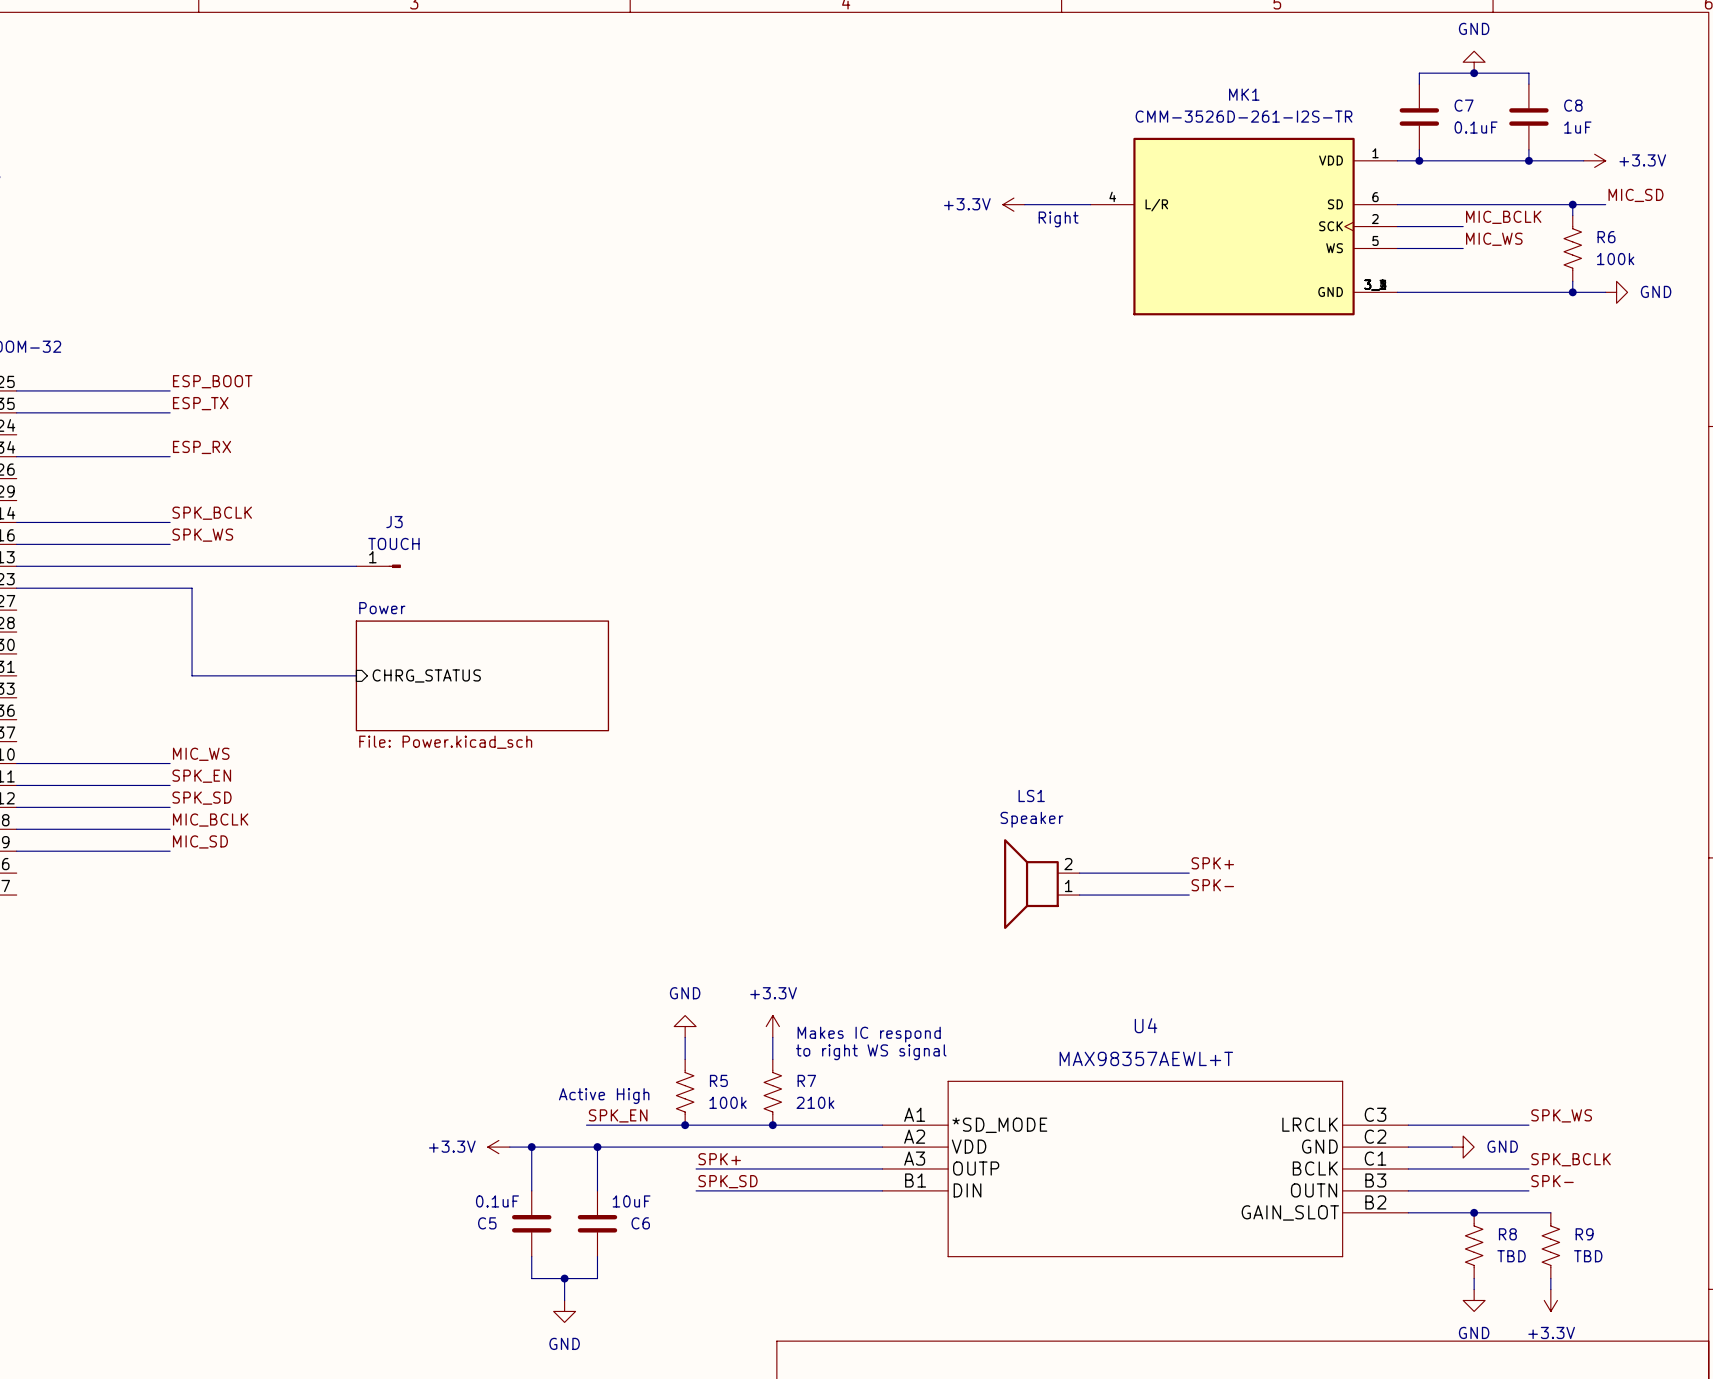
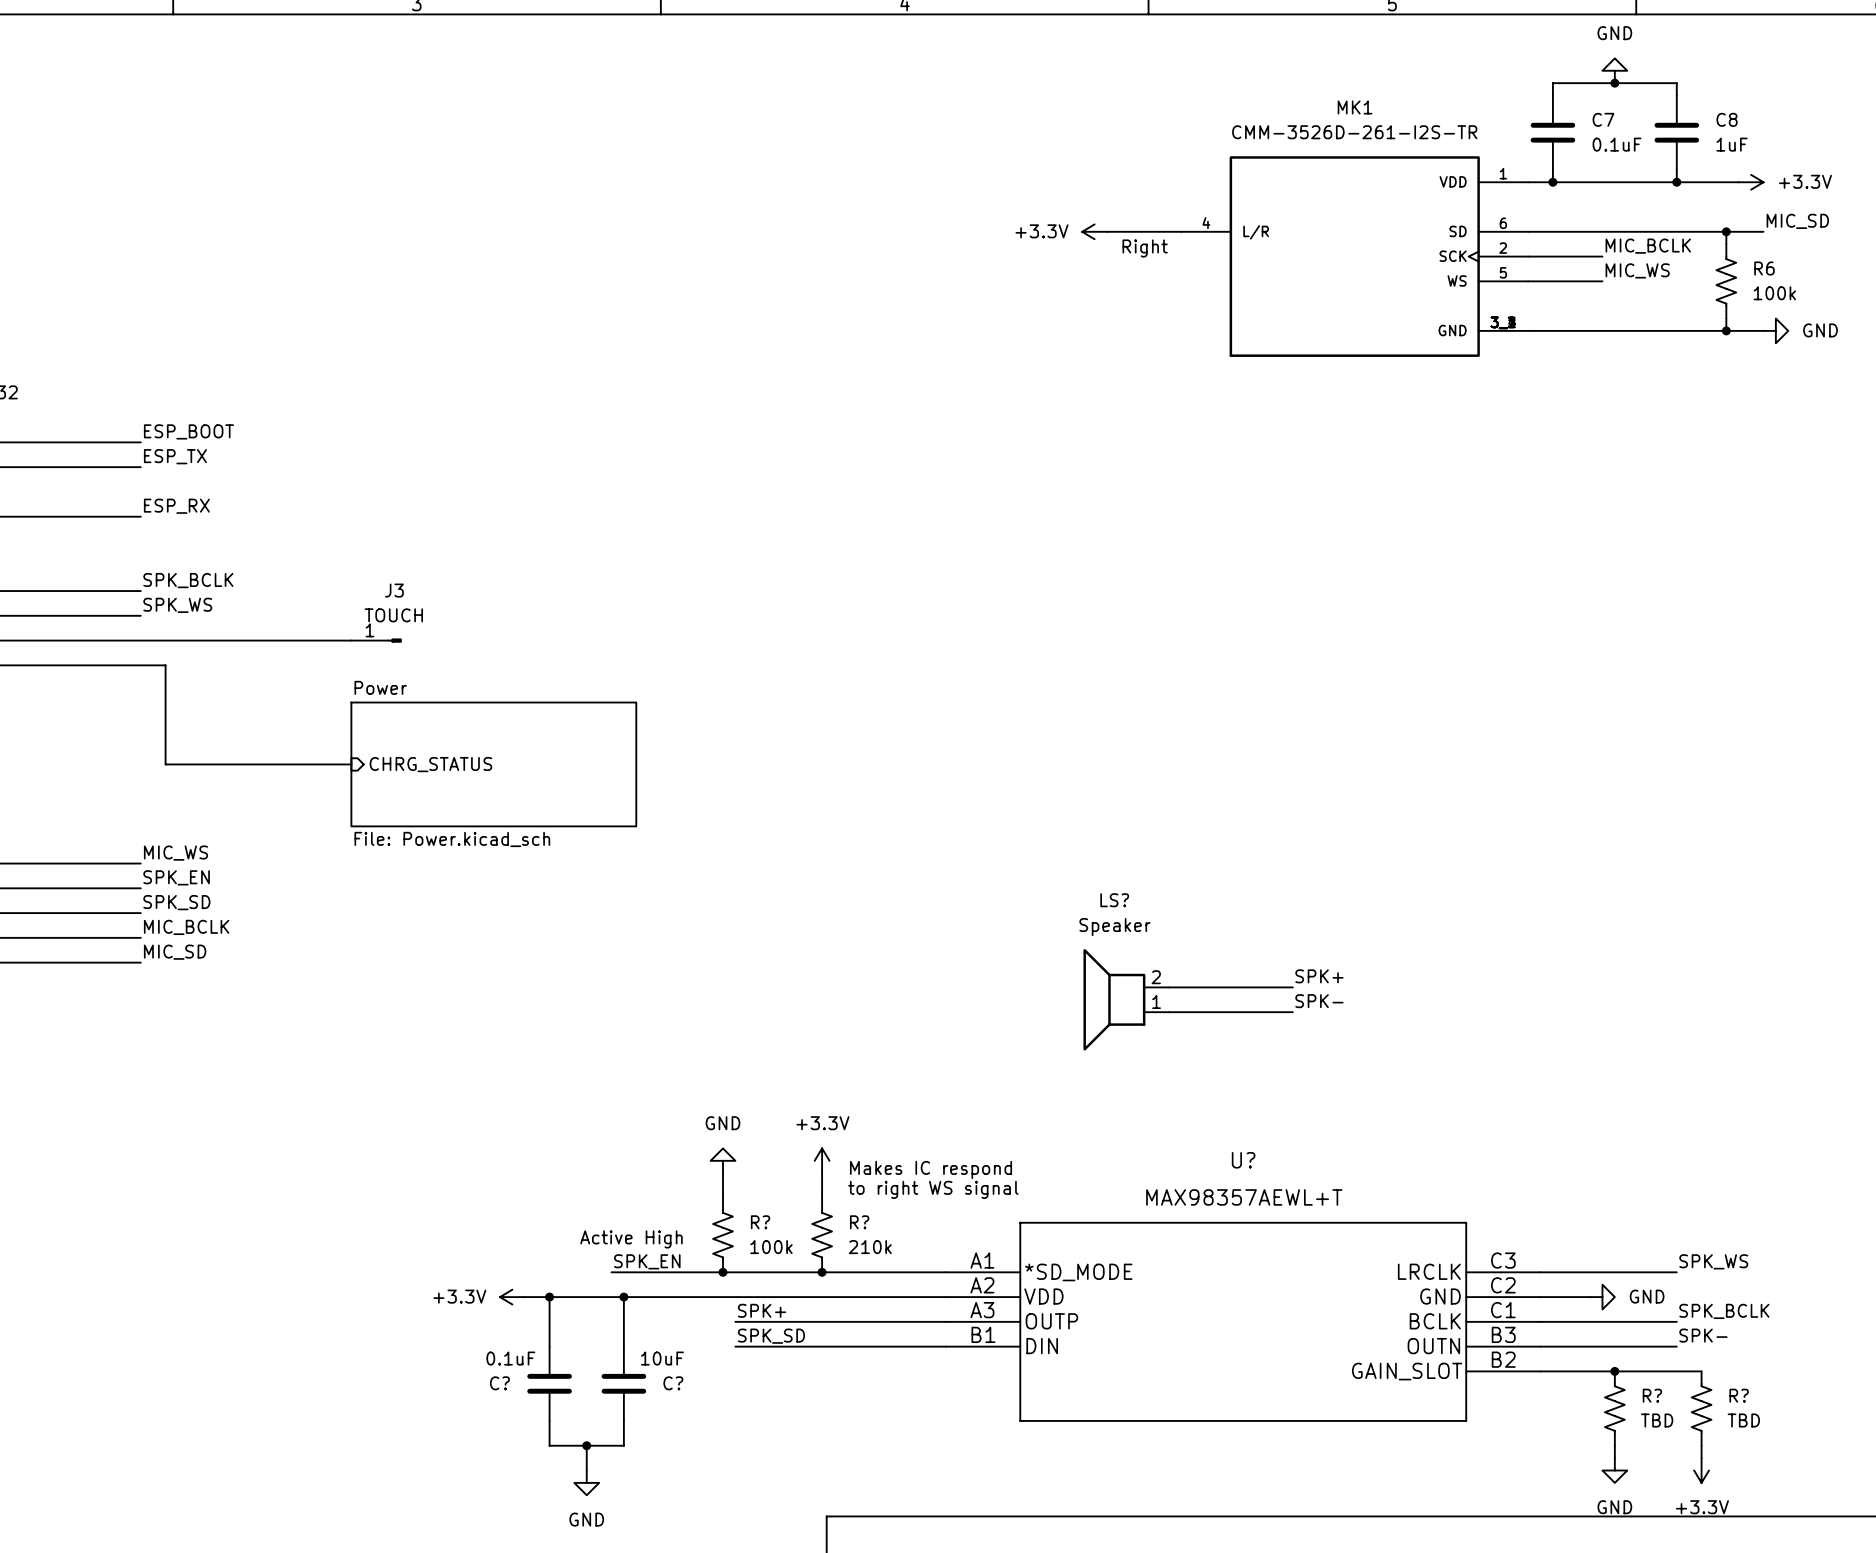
LS1 name: LS1 (1031, 796) -> LS? (1114, 900)
U4 name: U4 (1146, 1025) -> U? (1243, 1160)
R5 name: R5 (718, 1080) -> R? (760, 1222)
R7 name: R7 (806, 1080) -> R? (859, 1222)
C5 name: C5 (487, 1223) -> C? (499, 1383)
C6 name: C6 (640, 1223) -> C? (673, 1383)
R8 name: R8 (1507, 1234) -> R? (1652, 1395)
R9 name: R9 (1584, 1234) -> R? (1739, 1395)

